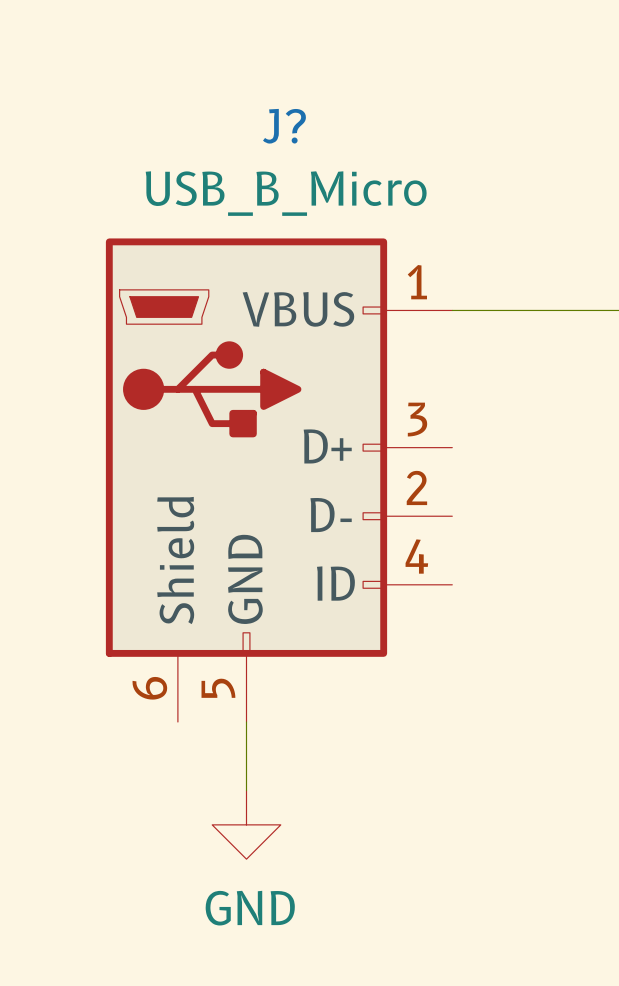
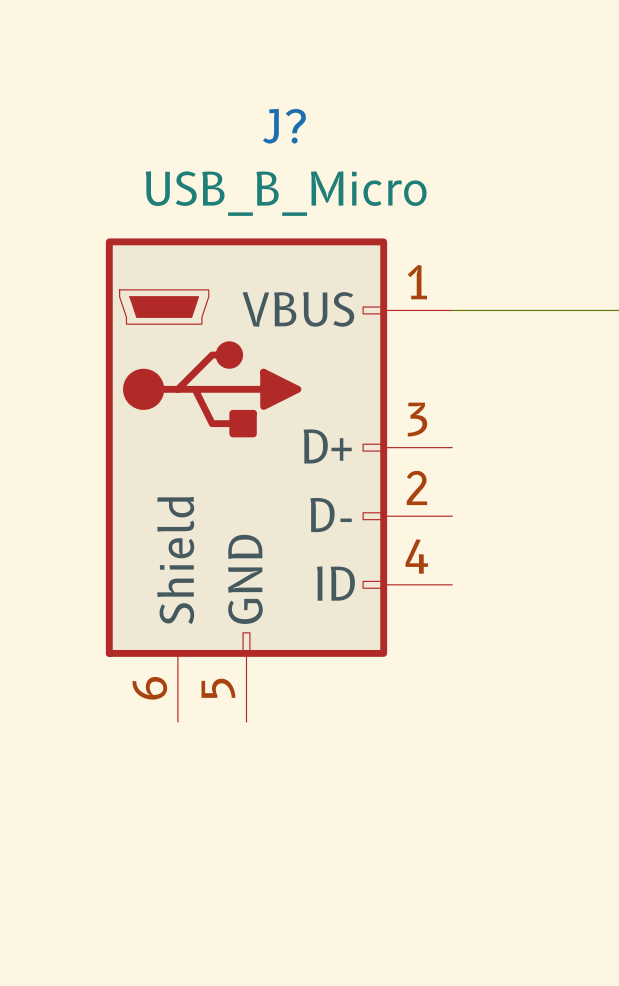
wire: (246, 721) (246, 790) -> none
power symbol: GND (246, 824) -> none

